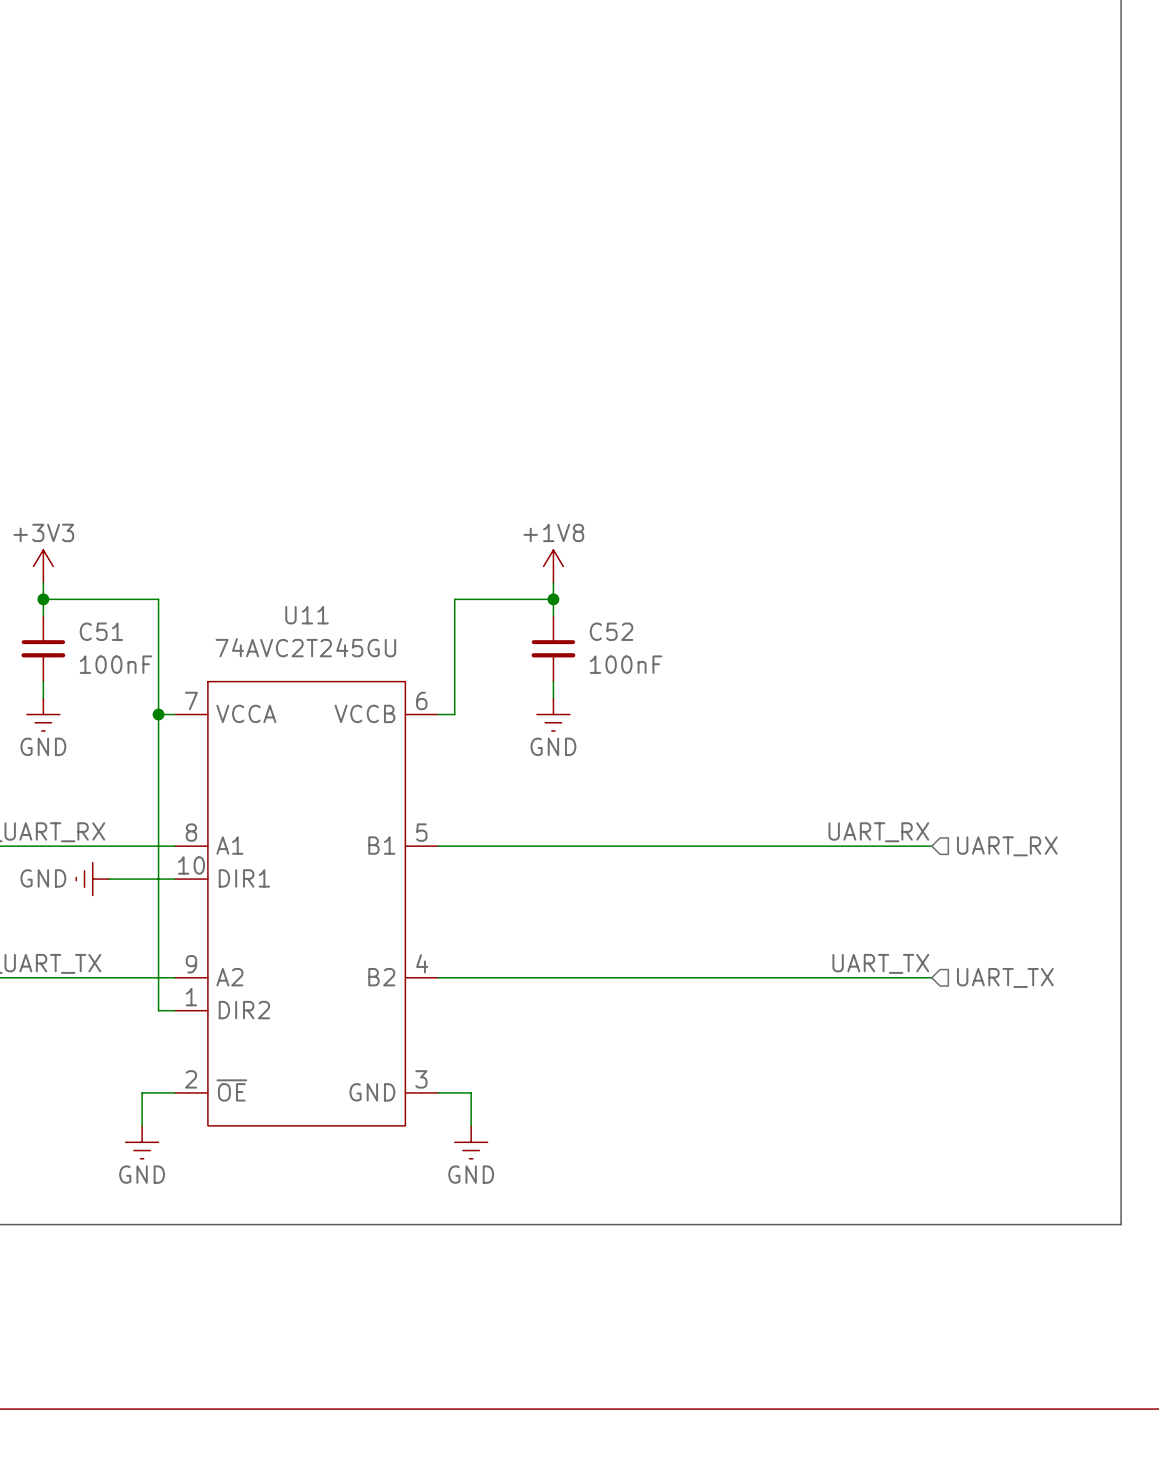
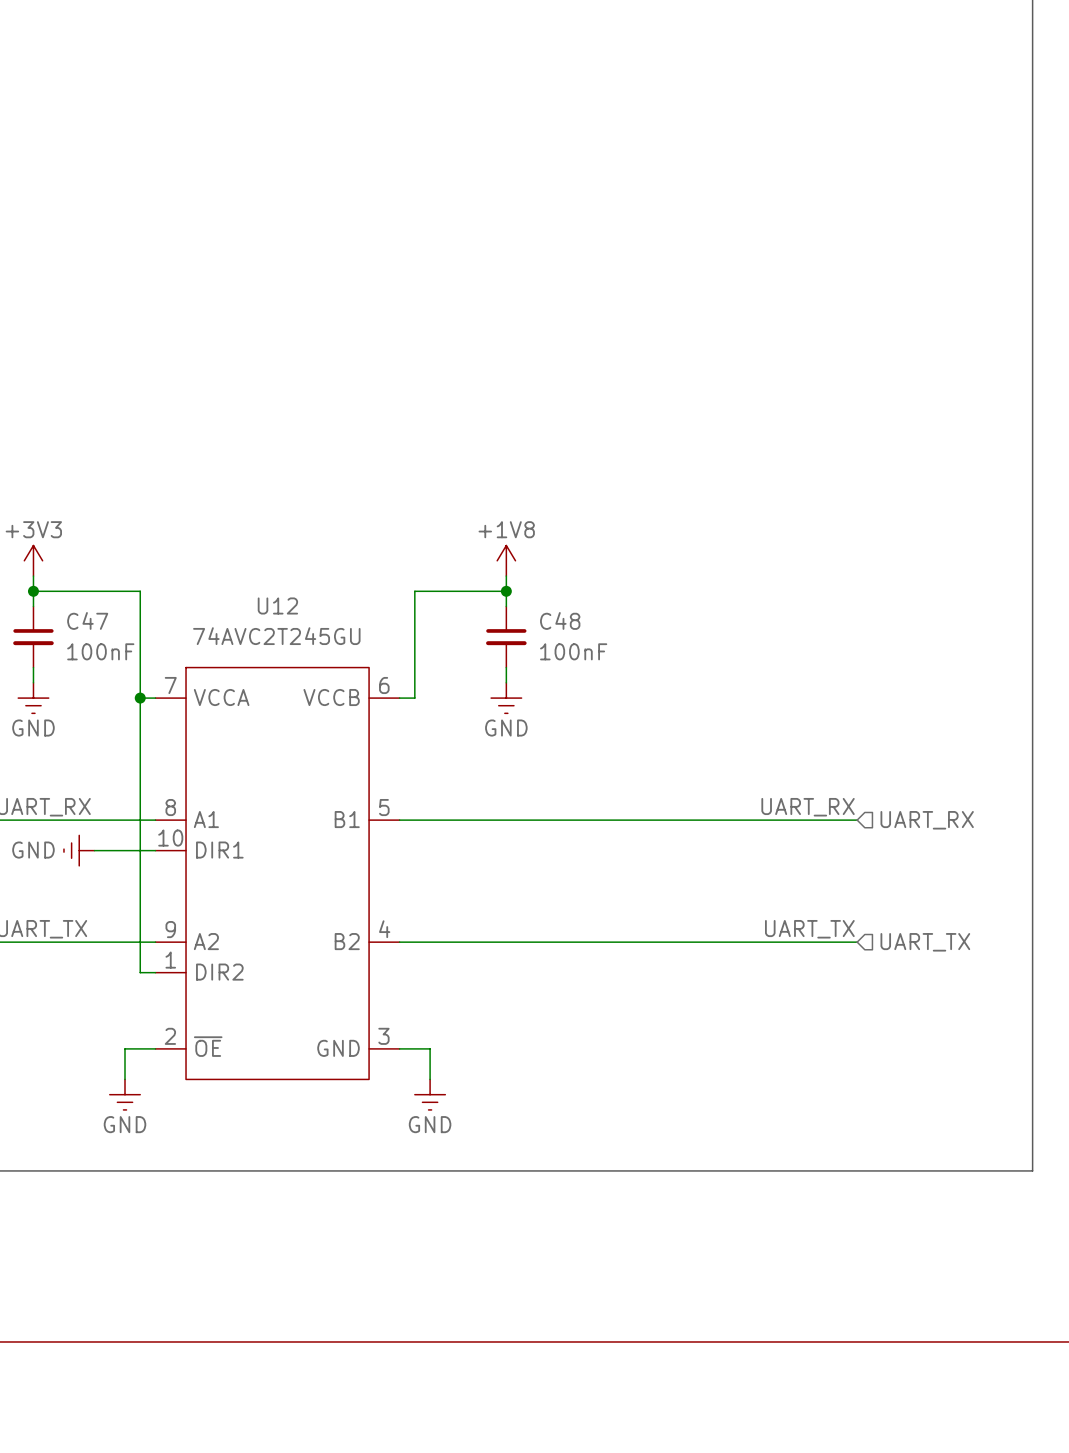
U11 name: U11 (307, 615) -> U12 (277, 605)
C51 name: C51 (101, 631) -> C47 (87, 620)
C52 name: C52 (611, 631) -> C48 (560, 620)

